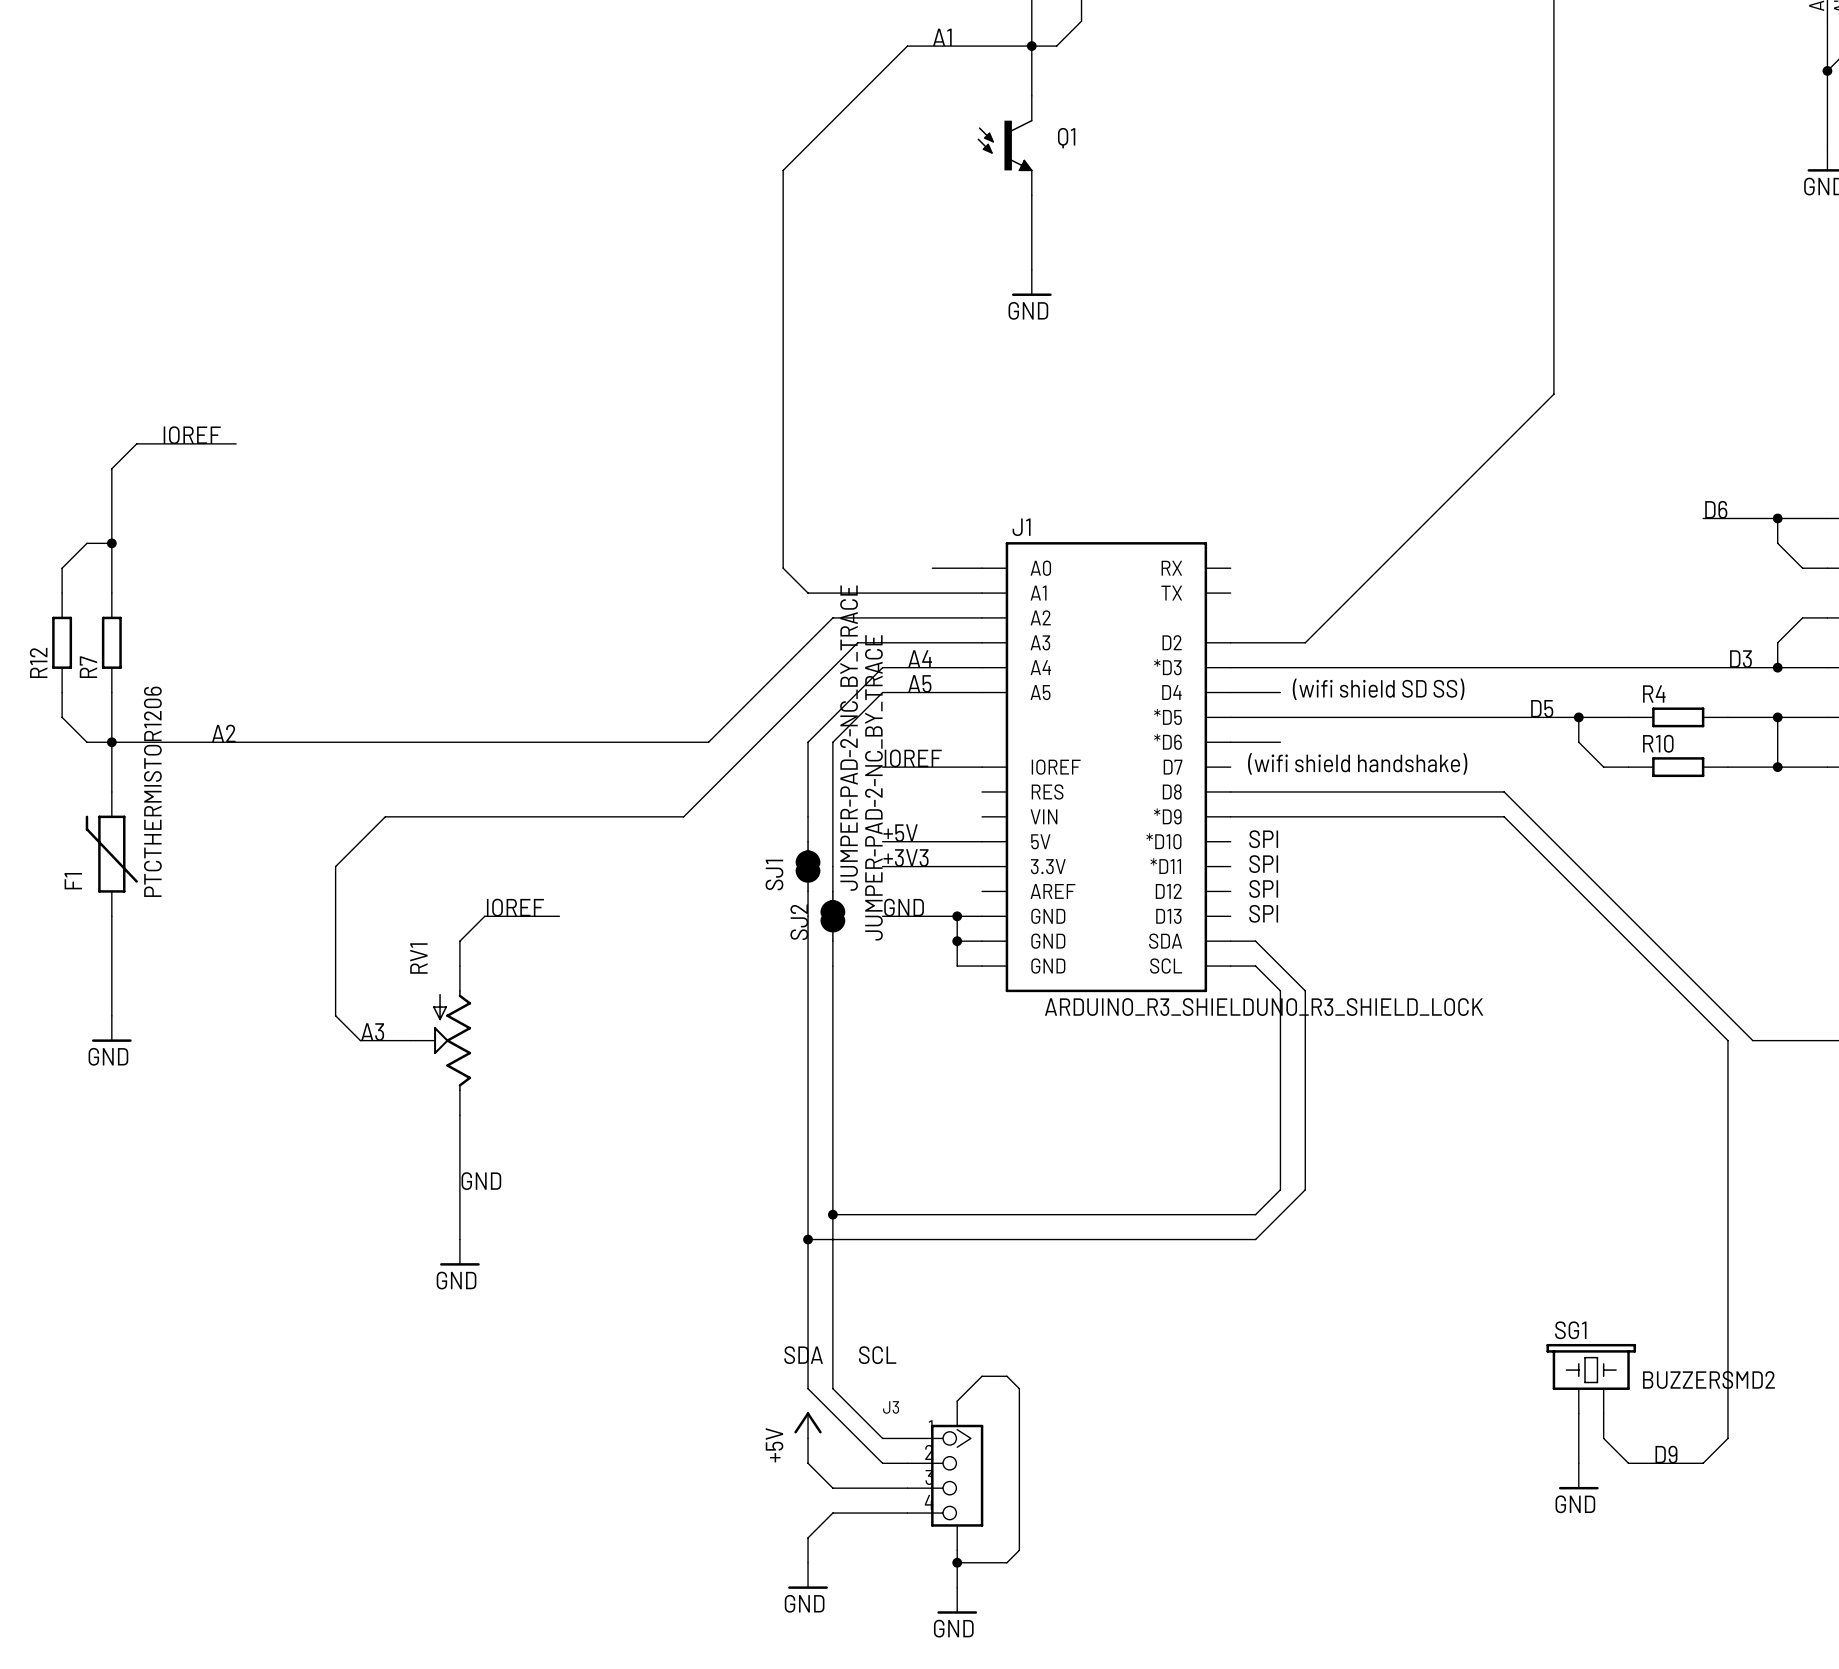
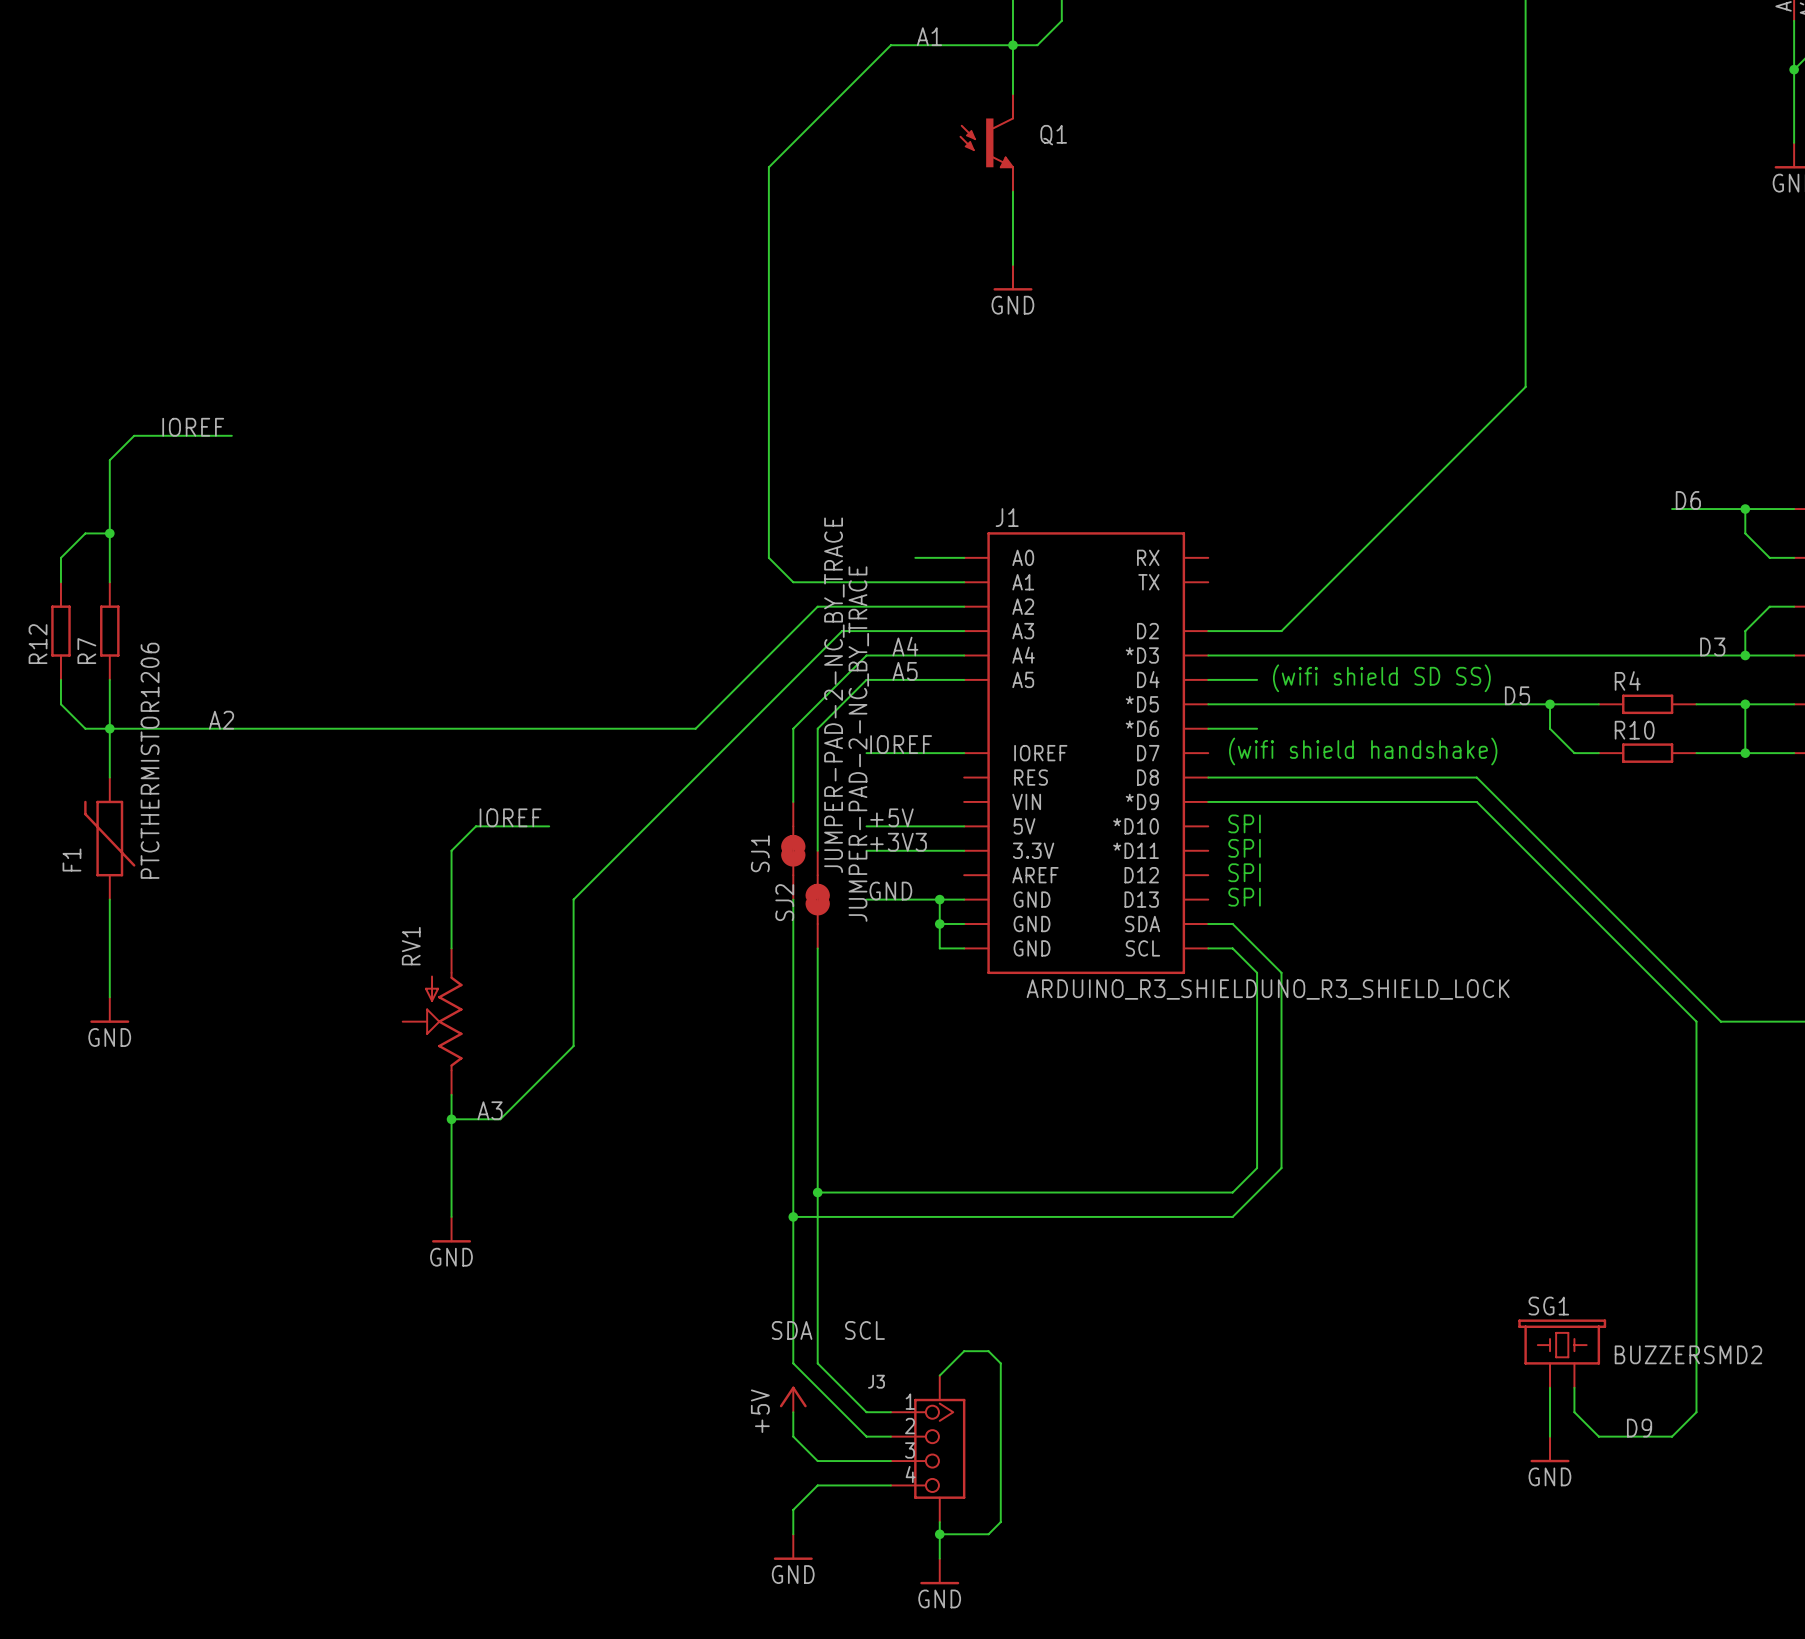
wire: (683, 816) (385, 816) (335, 866) (335, 1015) (360, 1040) (410, 1040) -> (671, 801) (573, 899) (573, 1046) (500, 1119) (451, 1119)
label position: IOREF (515, 907) -> IOREF (510, 817)
wire: (559, 916) (484, 916) (459, 941) -> (549, 826) (475, 826) (451, 850) (451, 924)
label position: A3 (372, 1032) -> A3 (490, 1110)
junction: none -> (451, 1119)
label: GND (481, 1181) -> none

